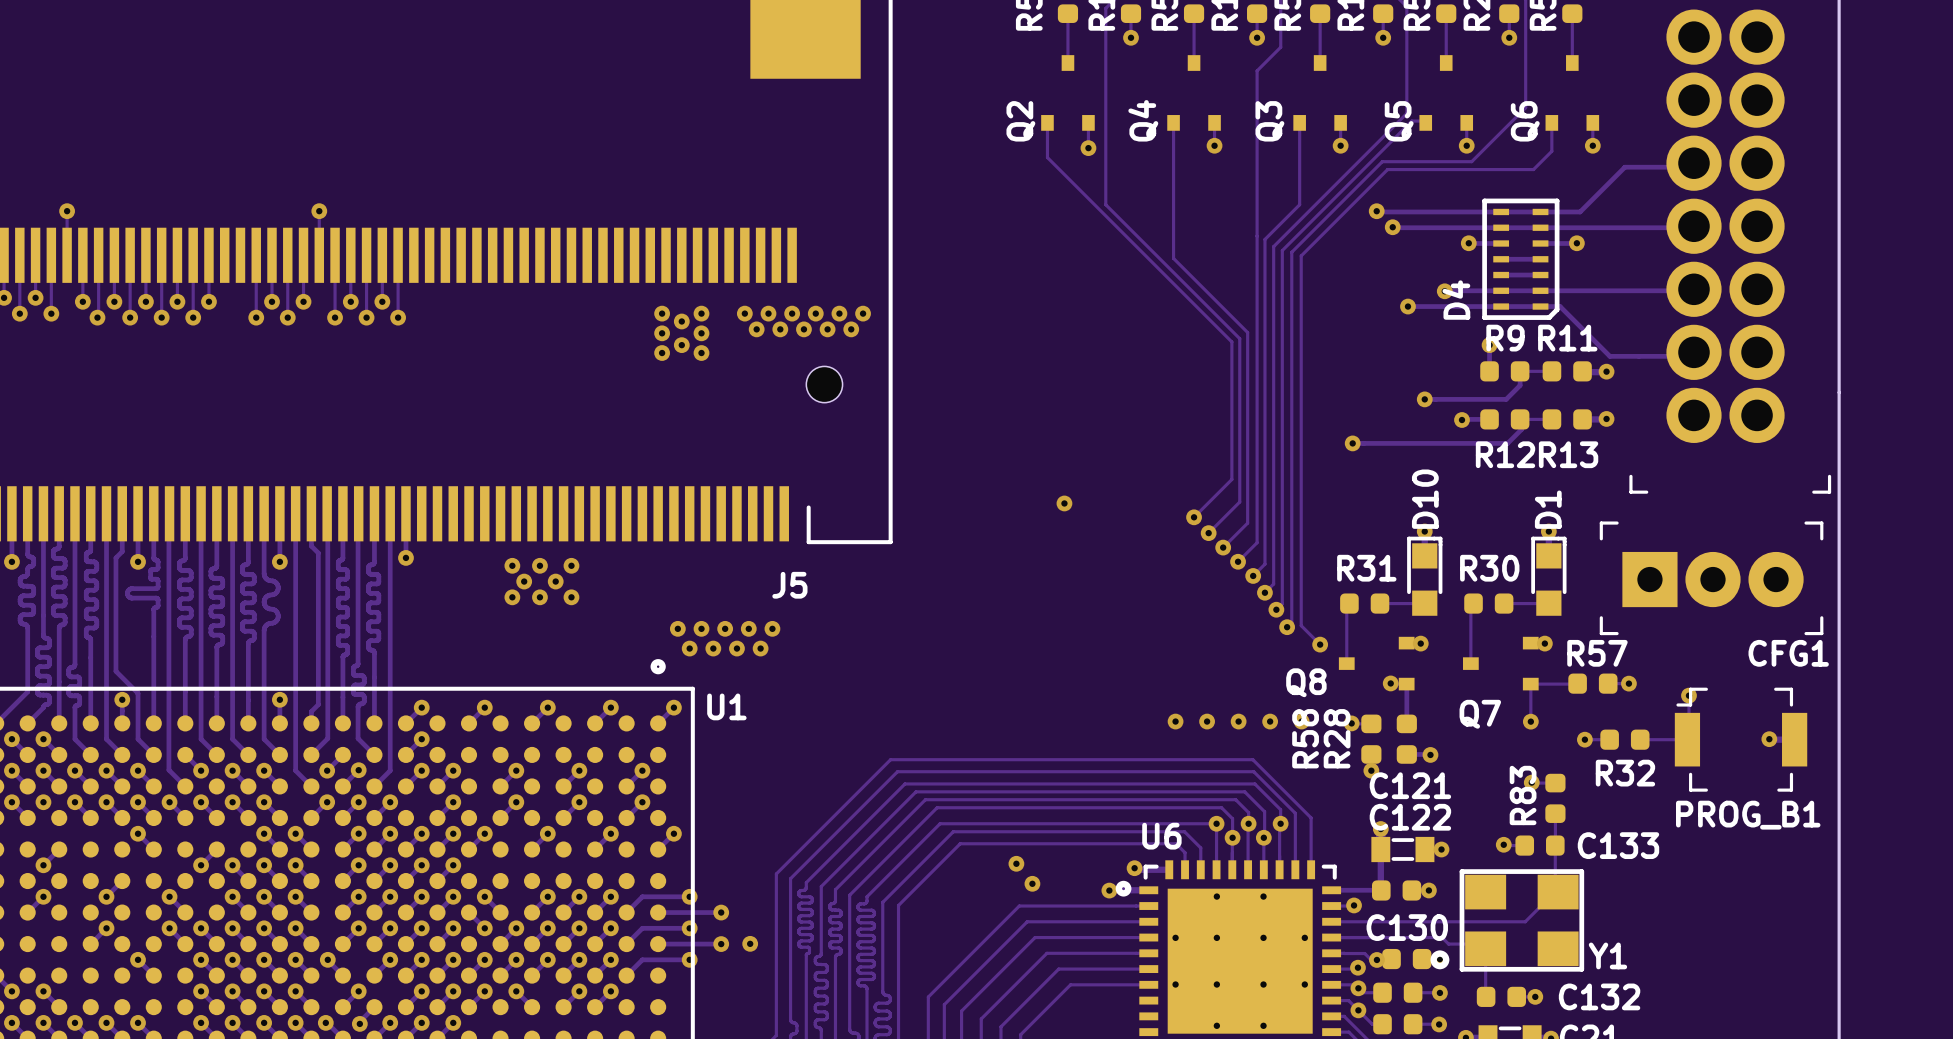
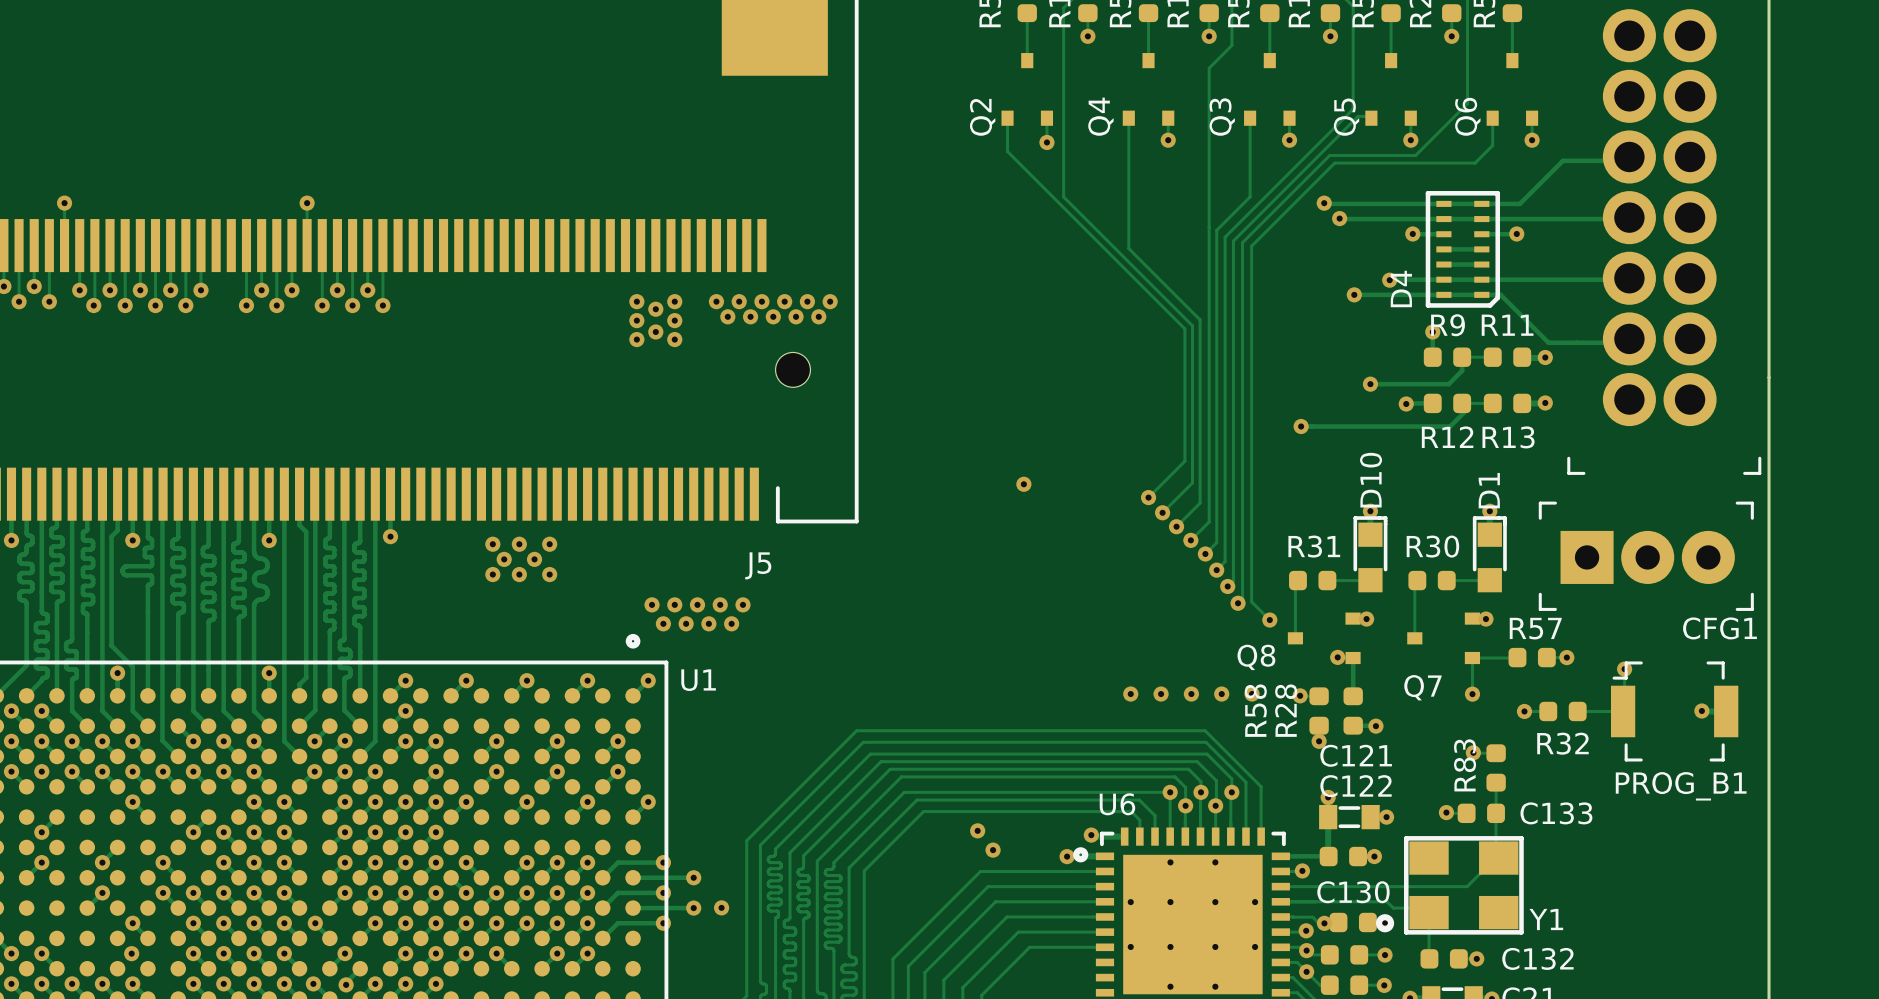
via: none -> (131, 953)

